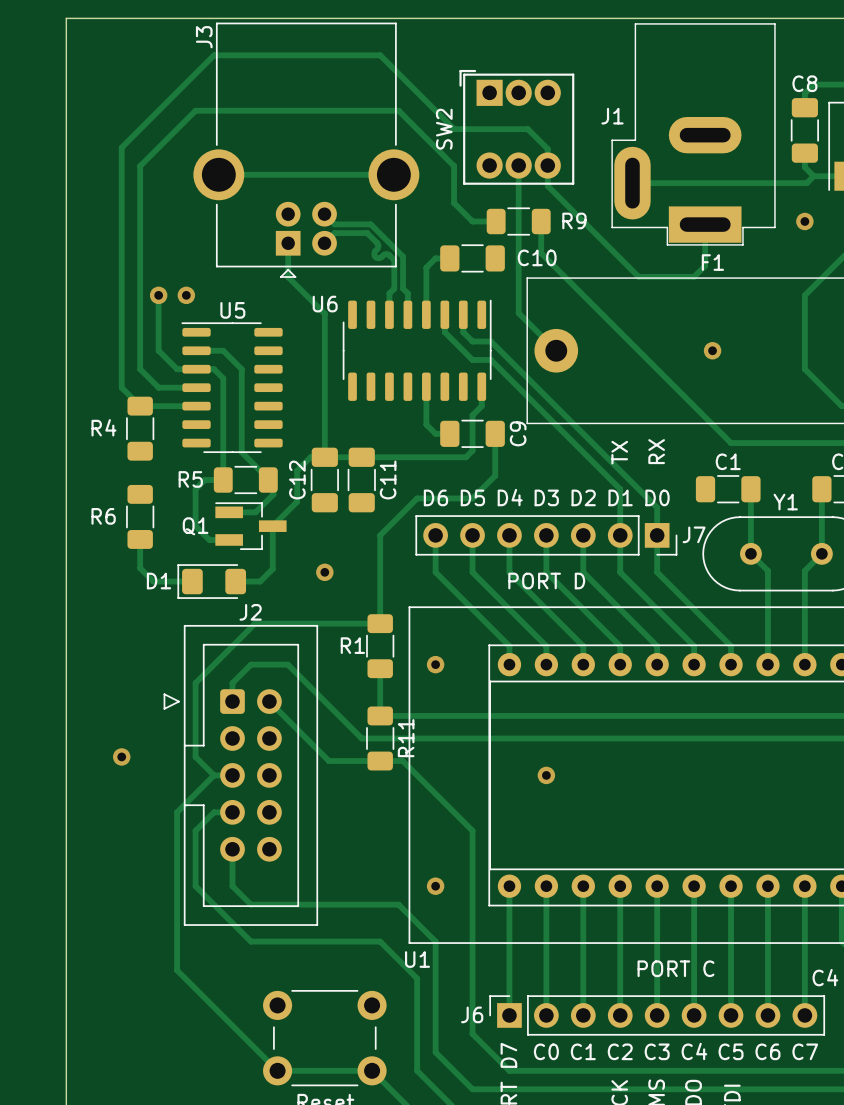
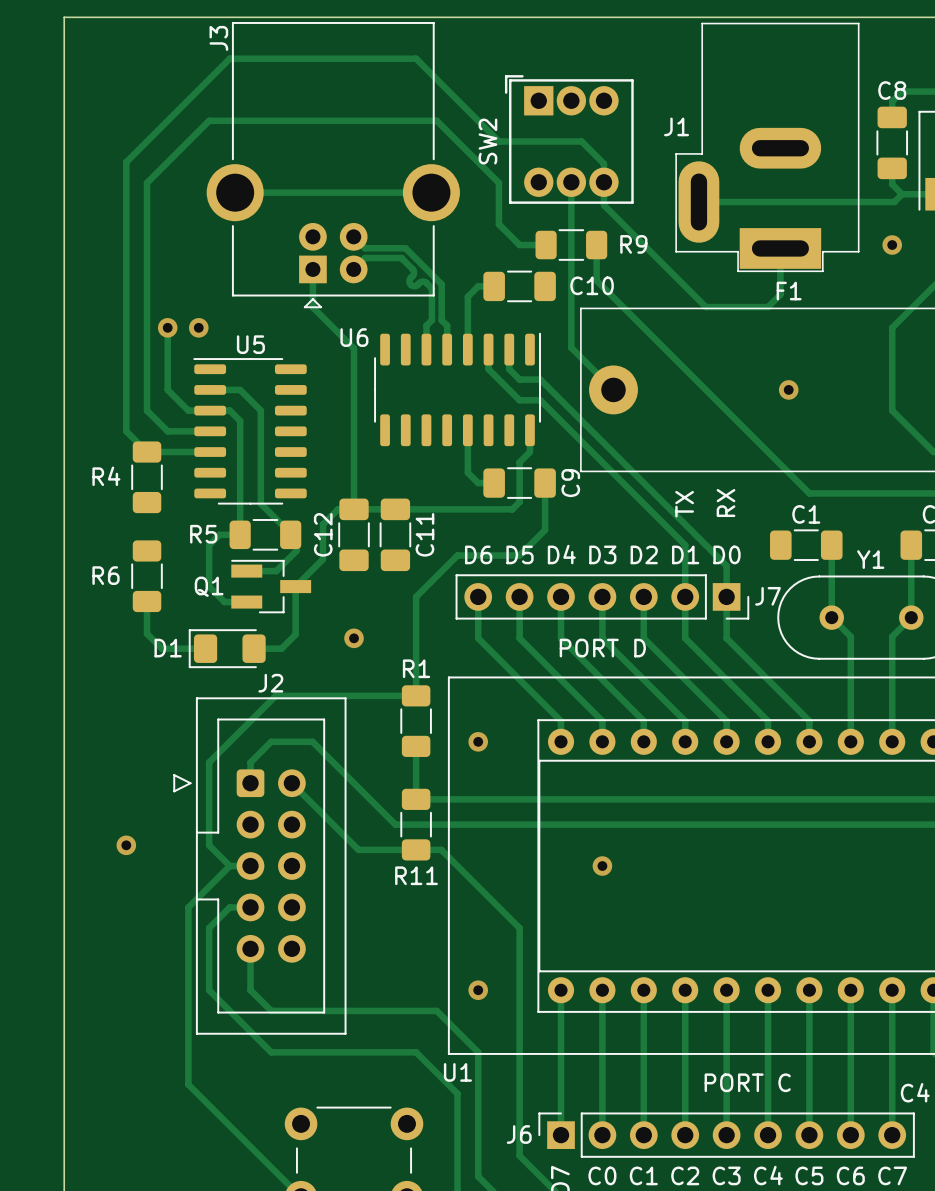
R1 name position: R1 (352, 645) -> R1 (416, 668)
R11 name rotation: 0° (406, 738) -> 90° clockwise (416, 875)
R11 name position: R11 (406, 738) -> R11 (416, 875)

